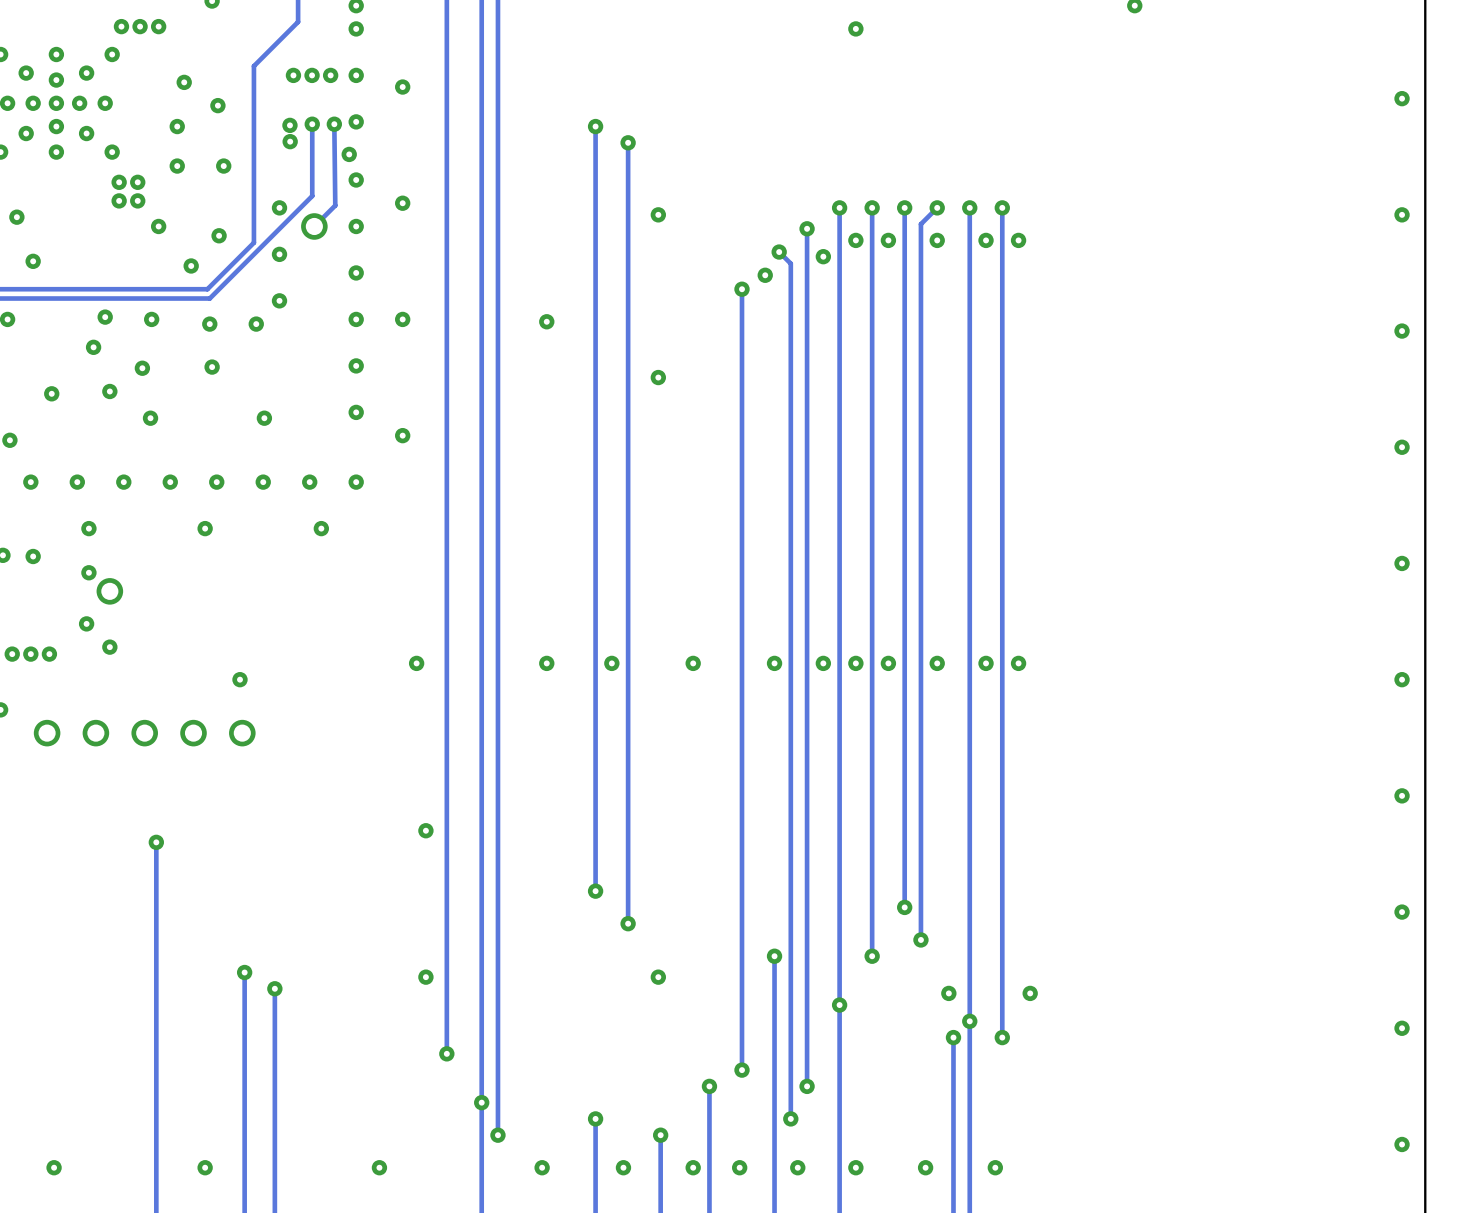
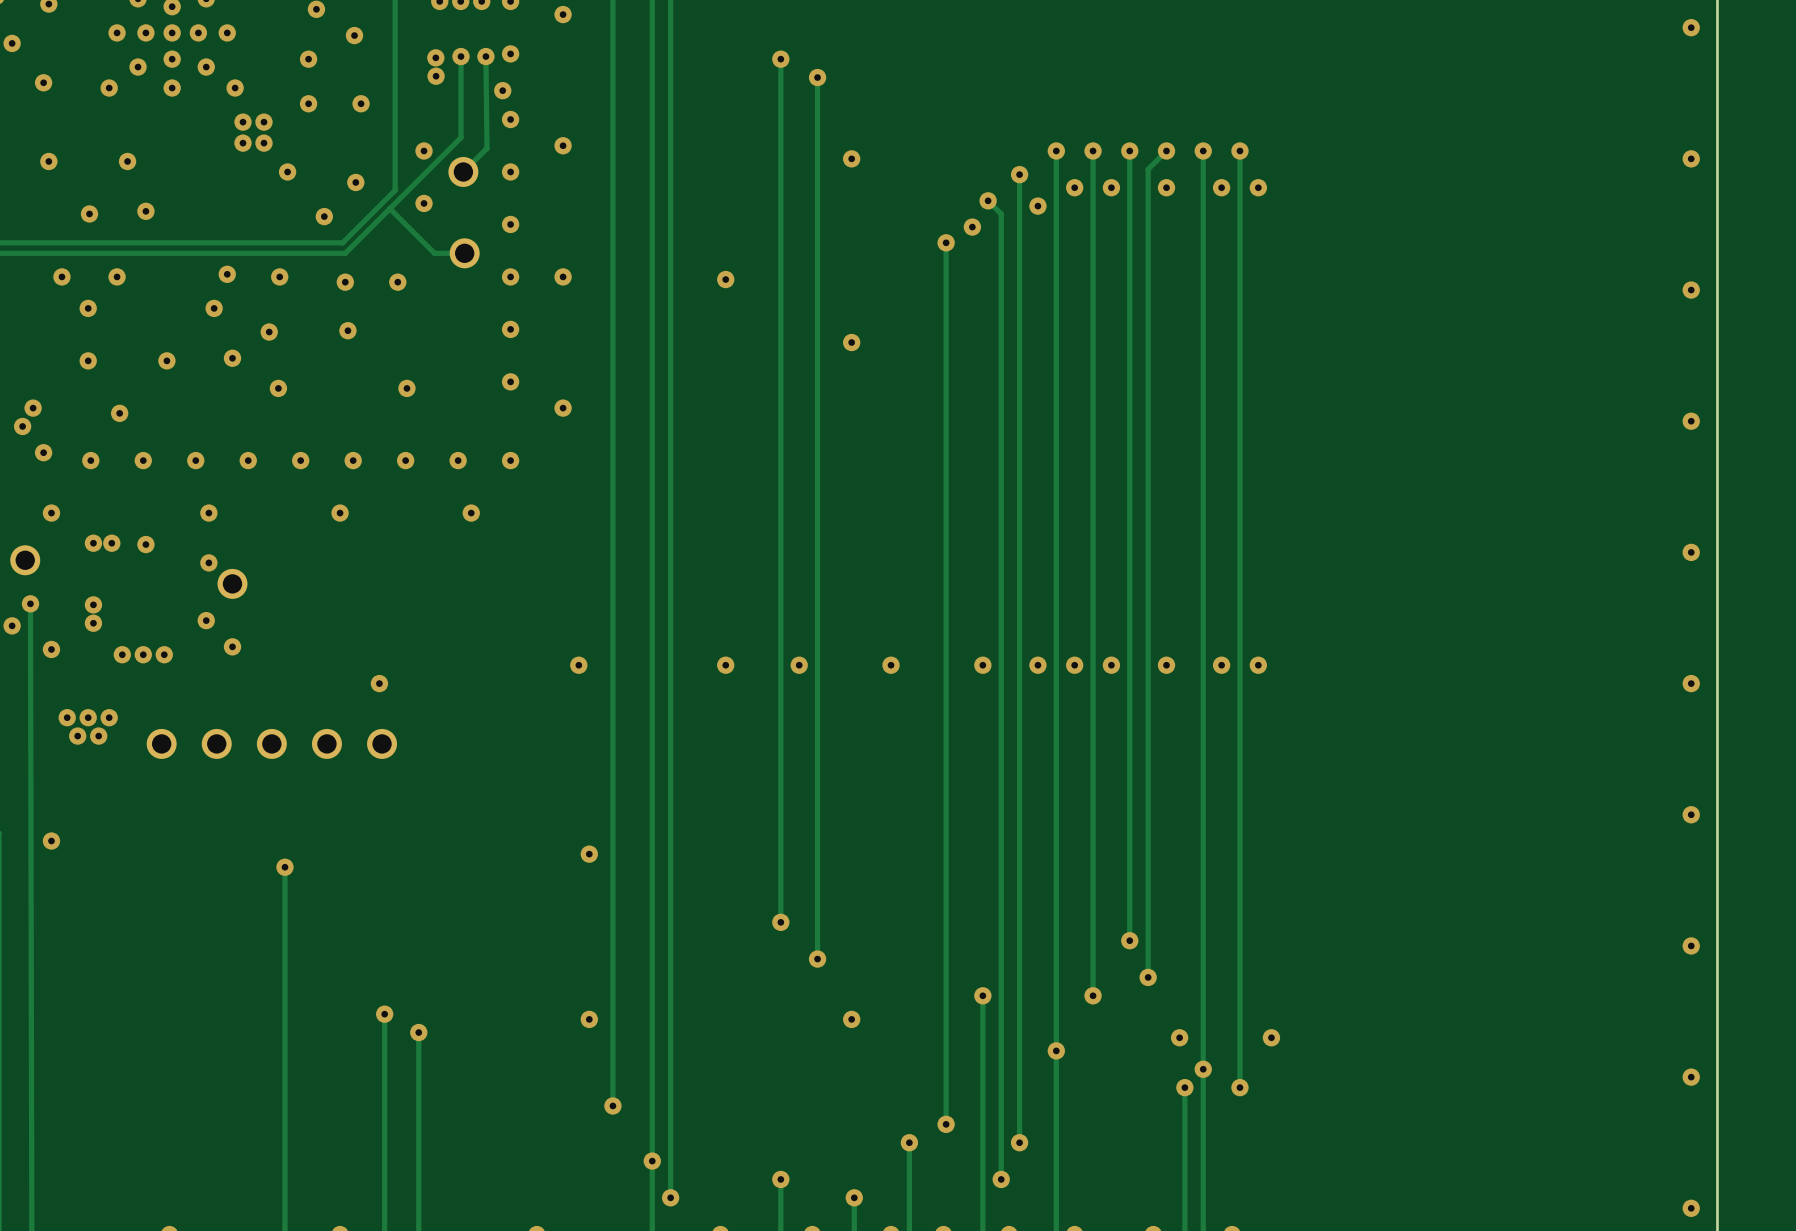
track: none -> (389, 208) (434, 253) (464, 253)
part: none -> (464, 253)
via: (279, 300) -> none

